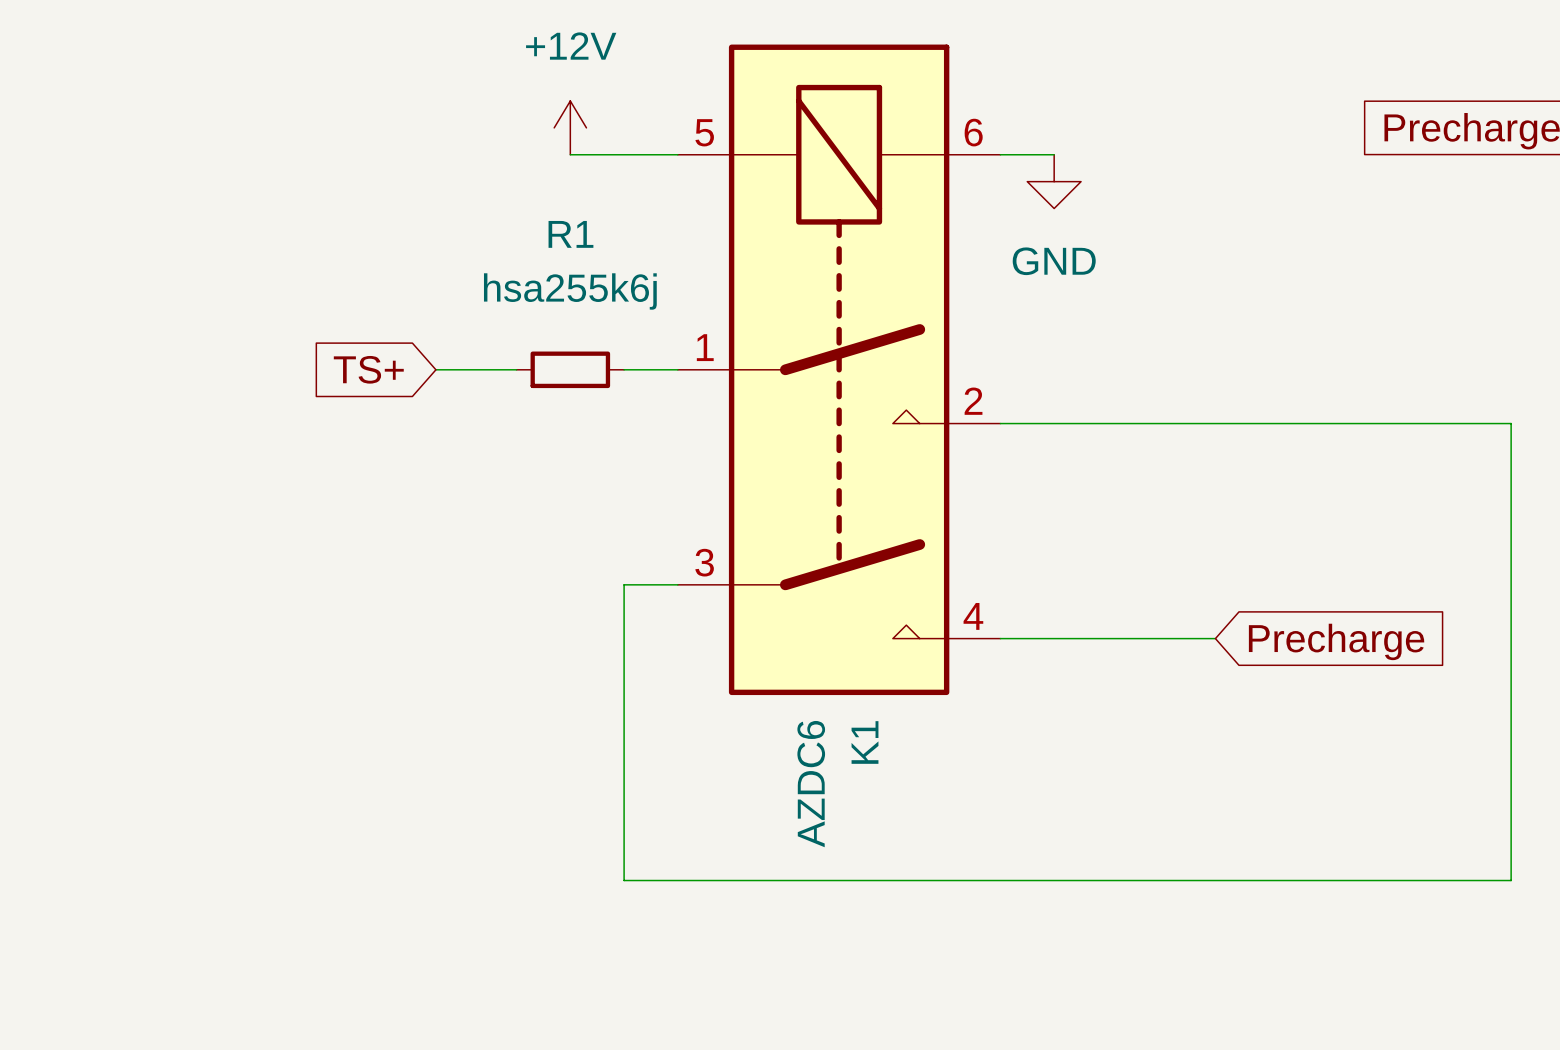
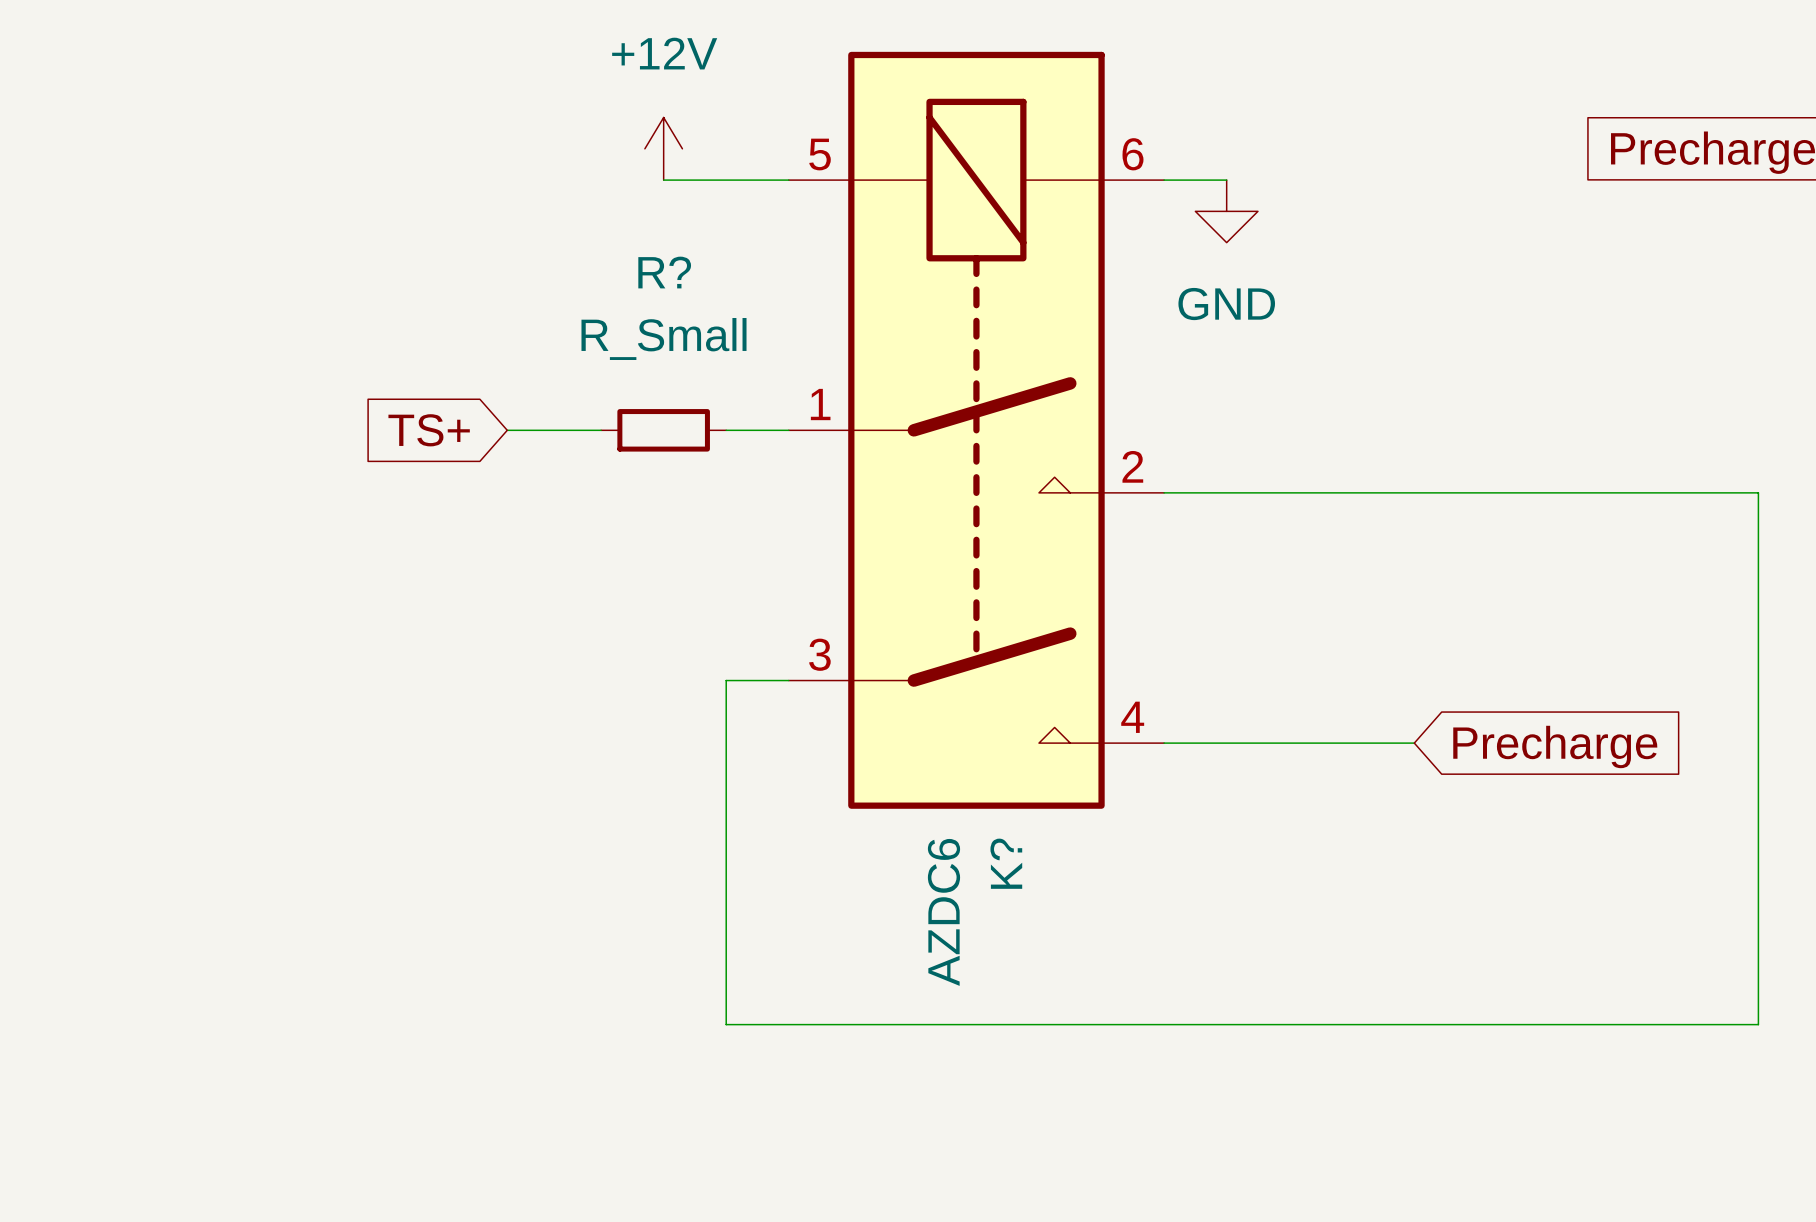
R1 name: R1 (570, 234) -> R? (664, 272)
R1 value: hsa255k6j (570, 291) -> R_Small (664, 338)
K1 name: K1 (865, 742) -> K? (1006, 863)

